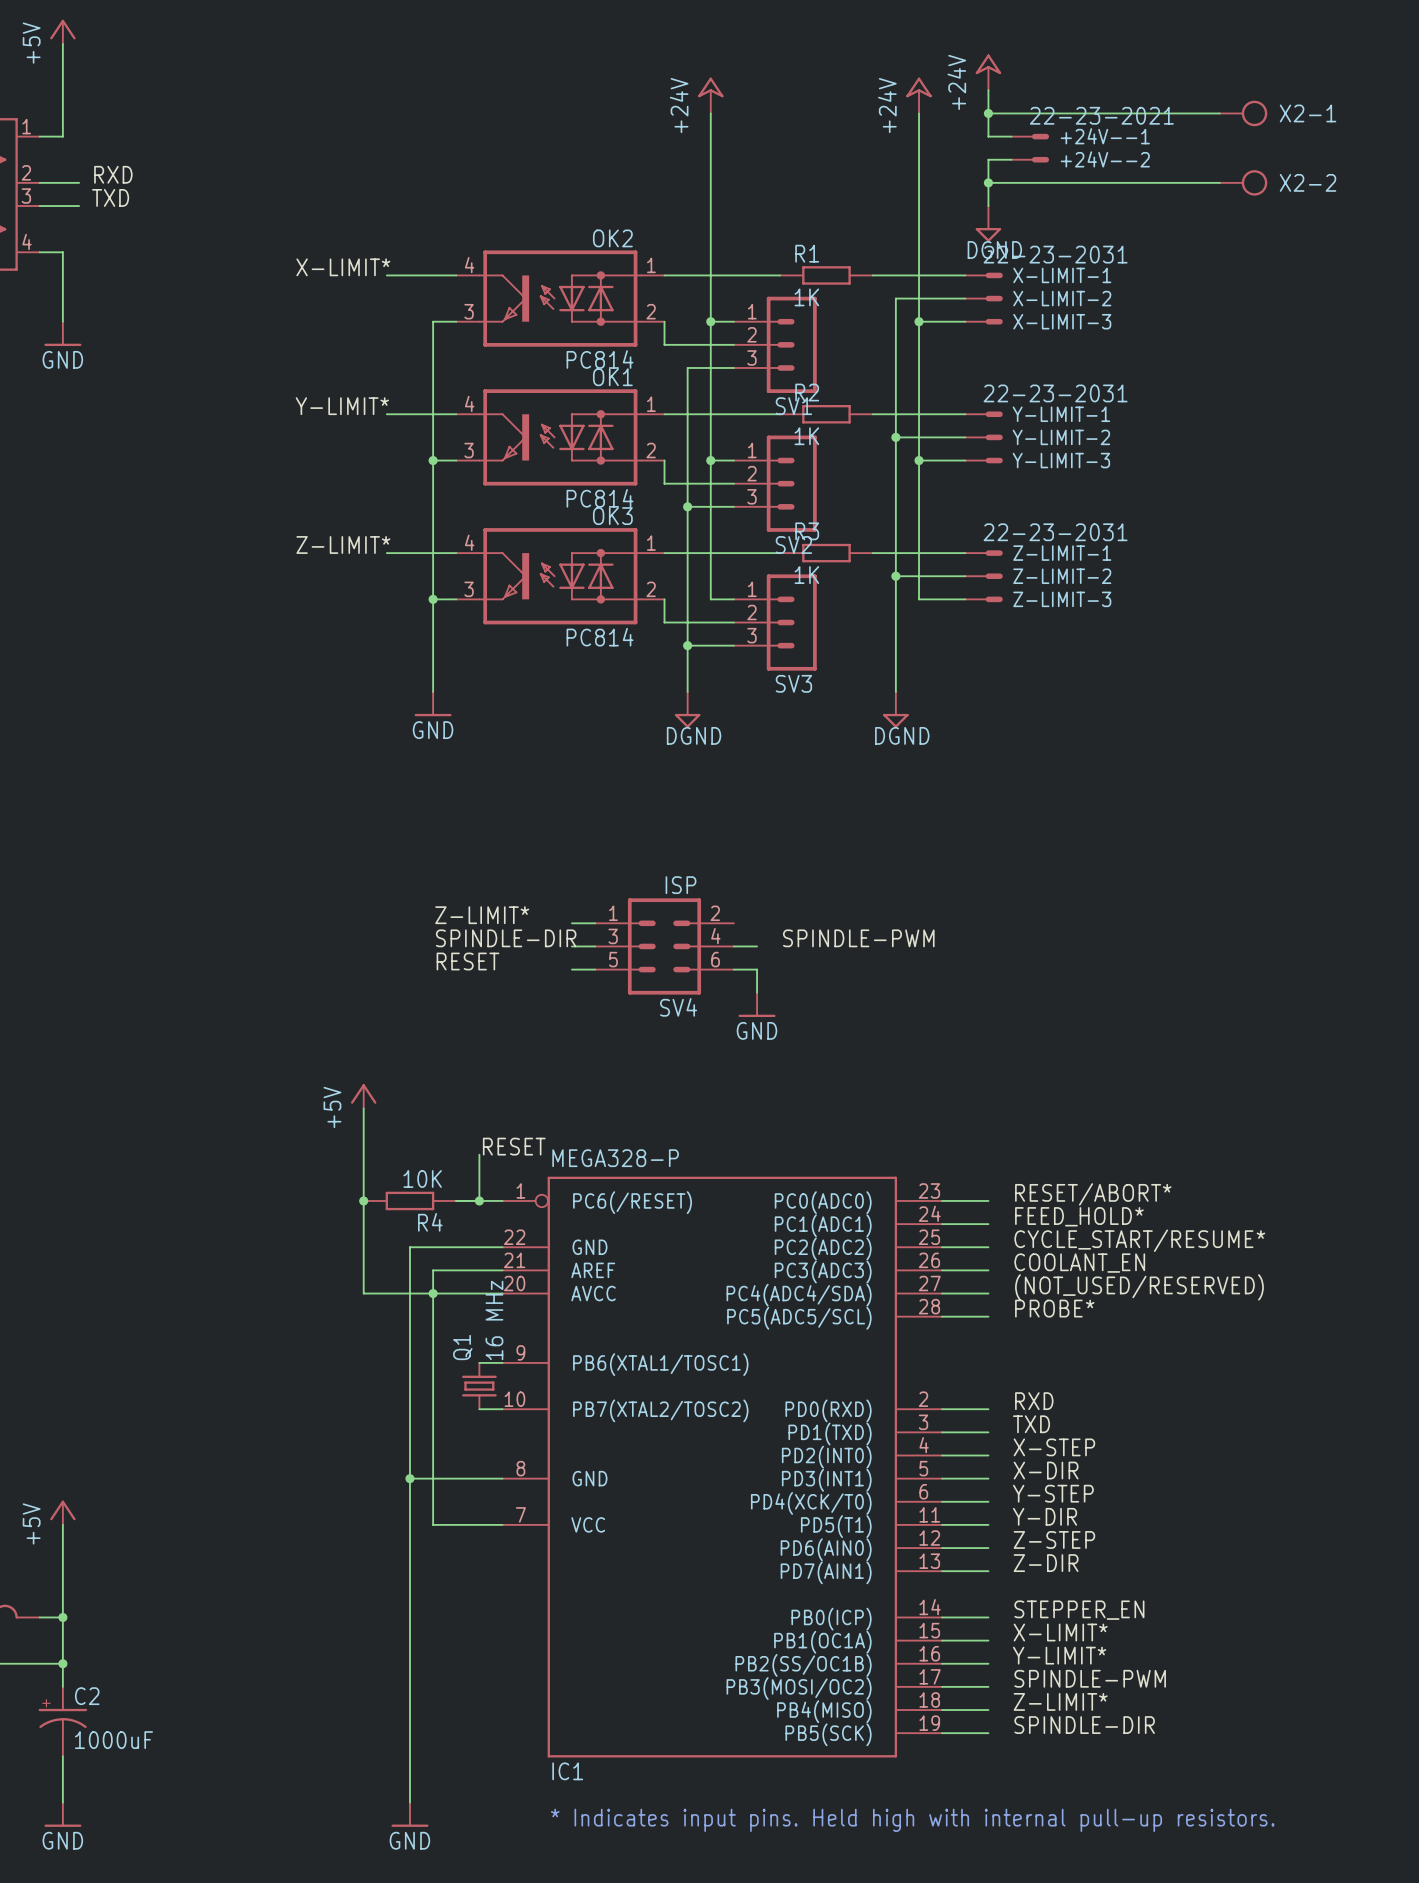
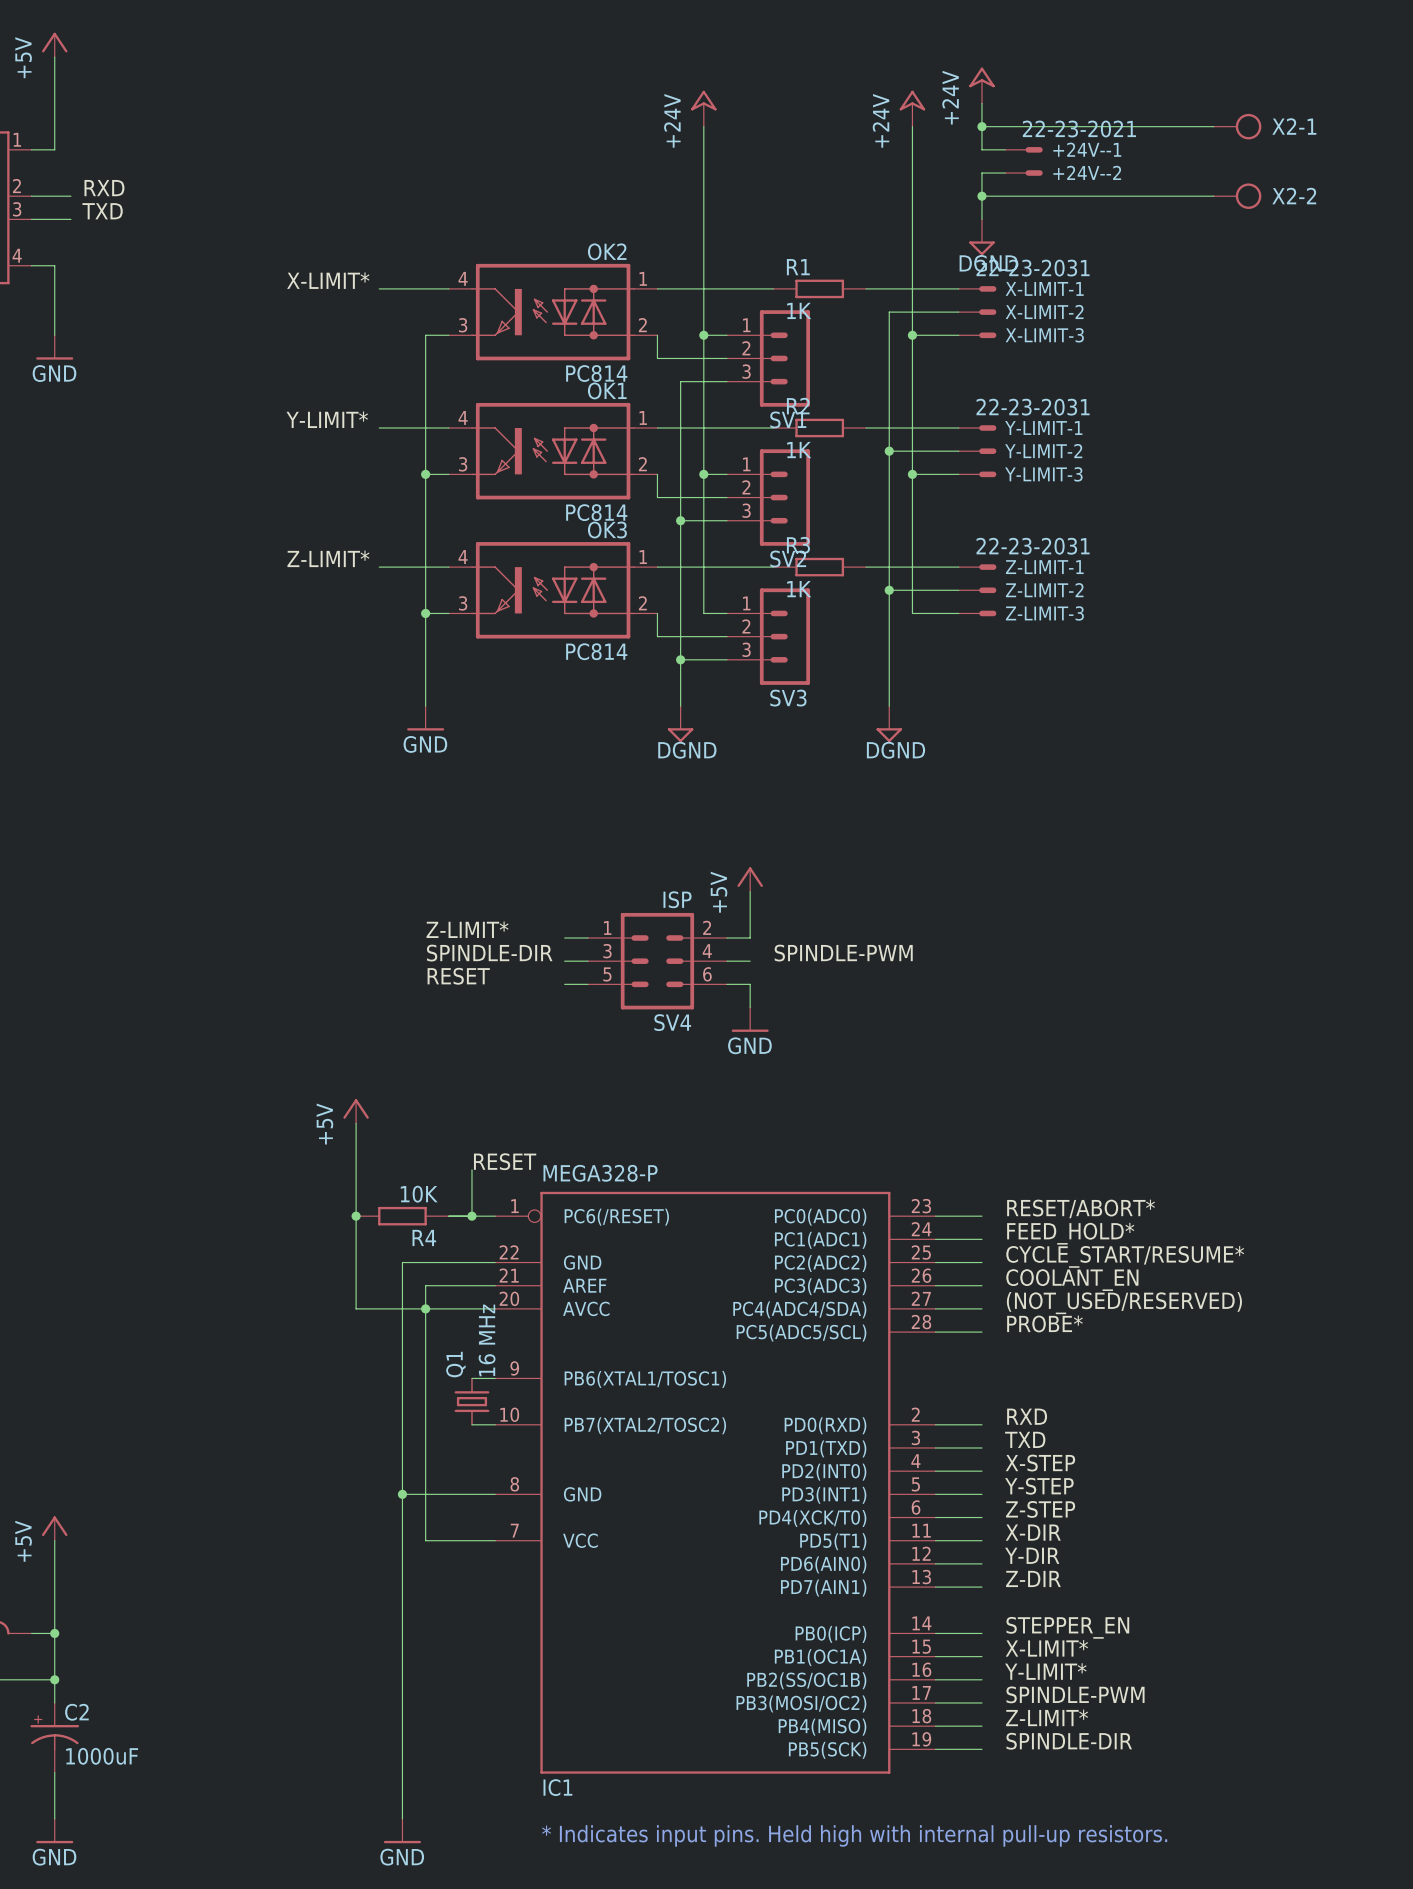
power symbol: none -> +5V (750, 879)
wire: none -> (750, 891) (750, 938) (726, 938)
label: X-DIR (1046, 1470) -> Y-STEP (1039, 1486)
label: Y-STEP (1053, 1493) -> Z-STEP (1040, 1509)
label: Y-DIR (1045, 1516) -> X-DIR (1033, 1532)
label: Z-STEP (1054, 1539) -> Y-DIR (1032, 1555)

